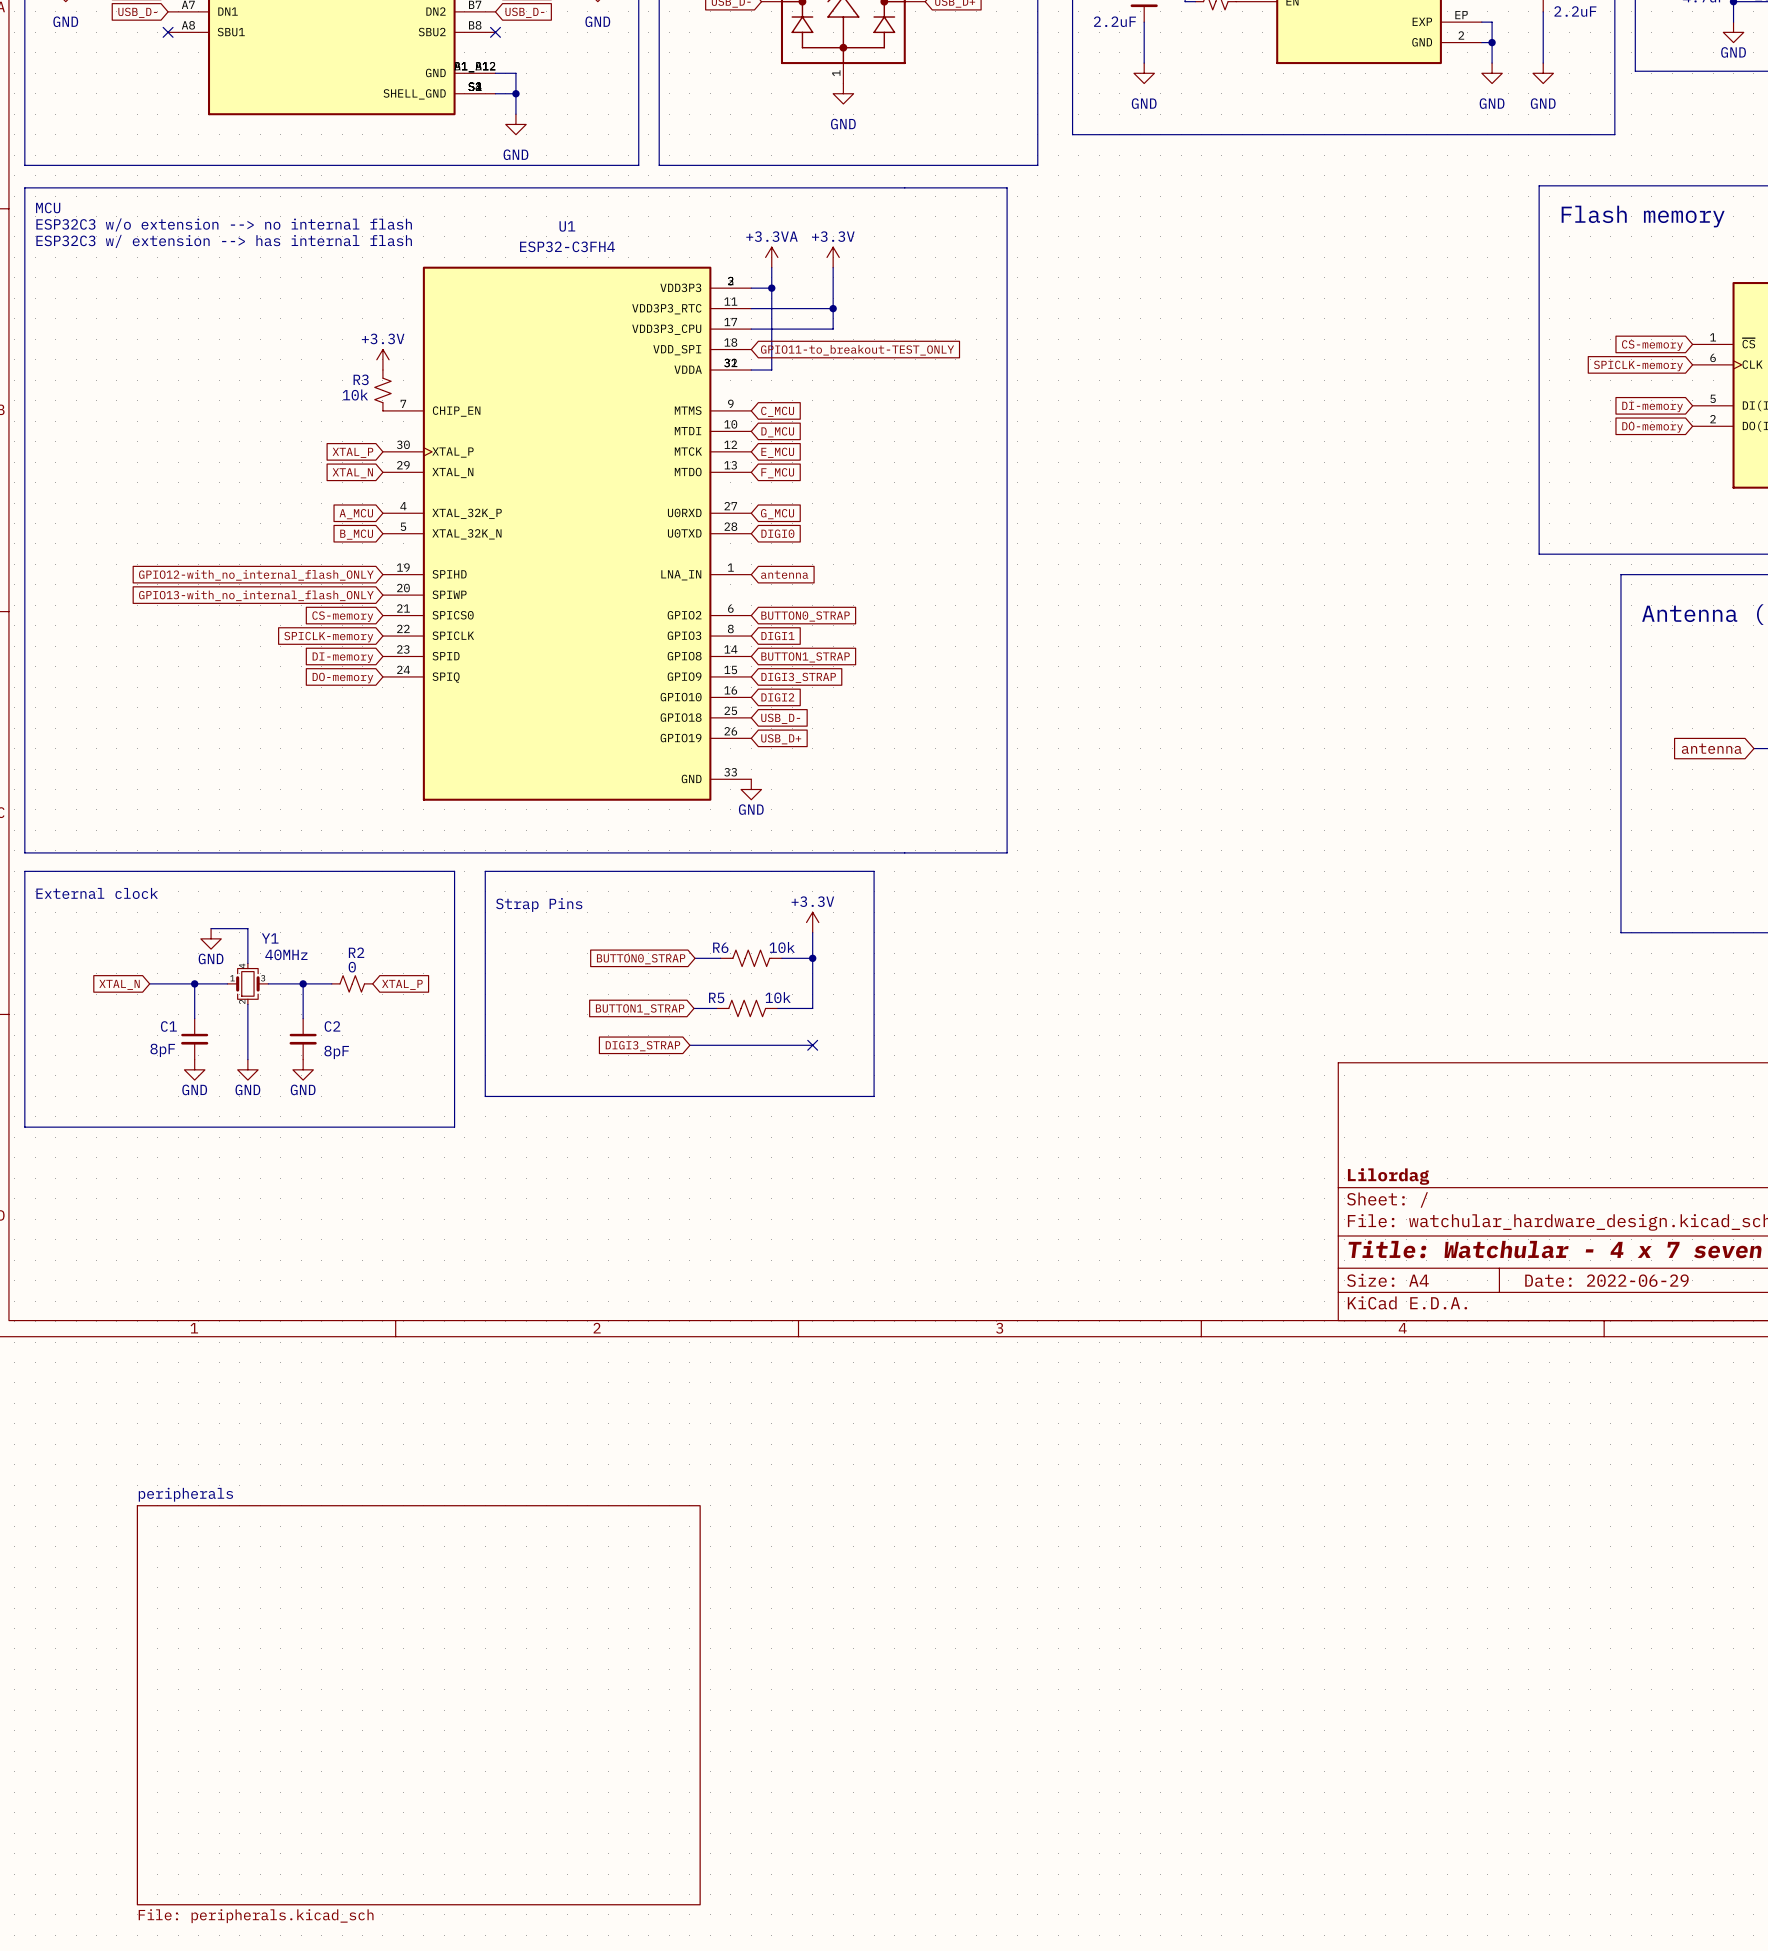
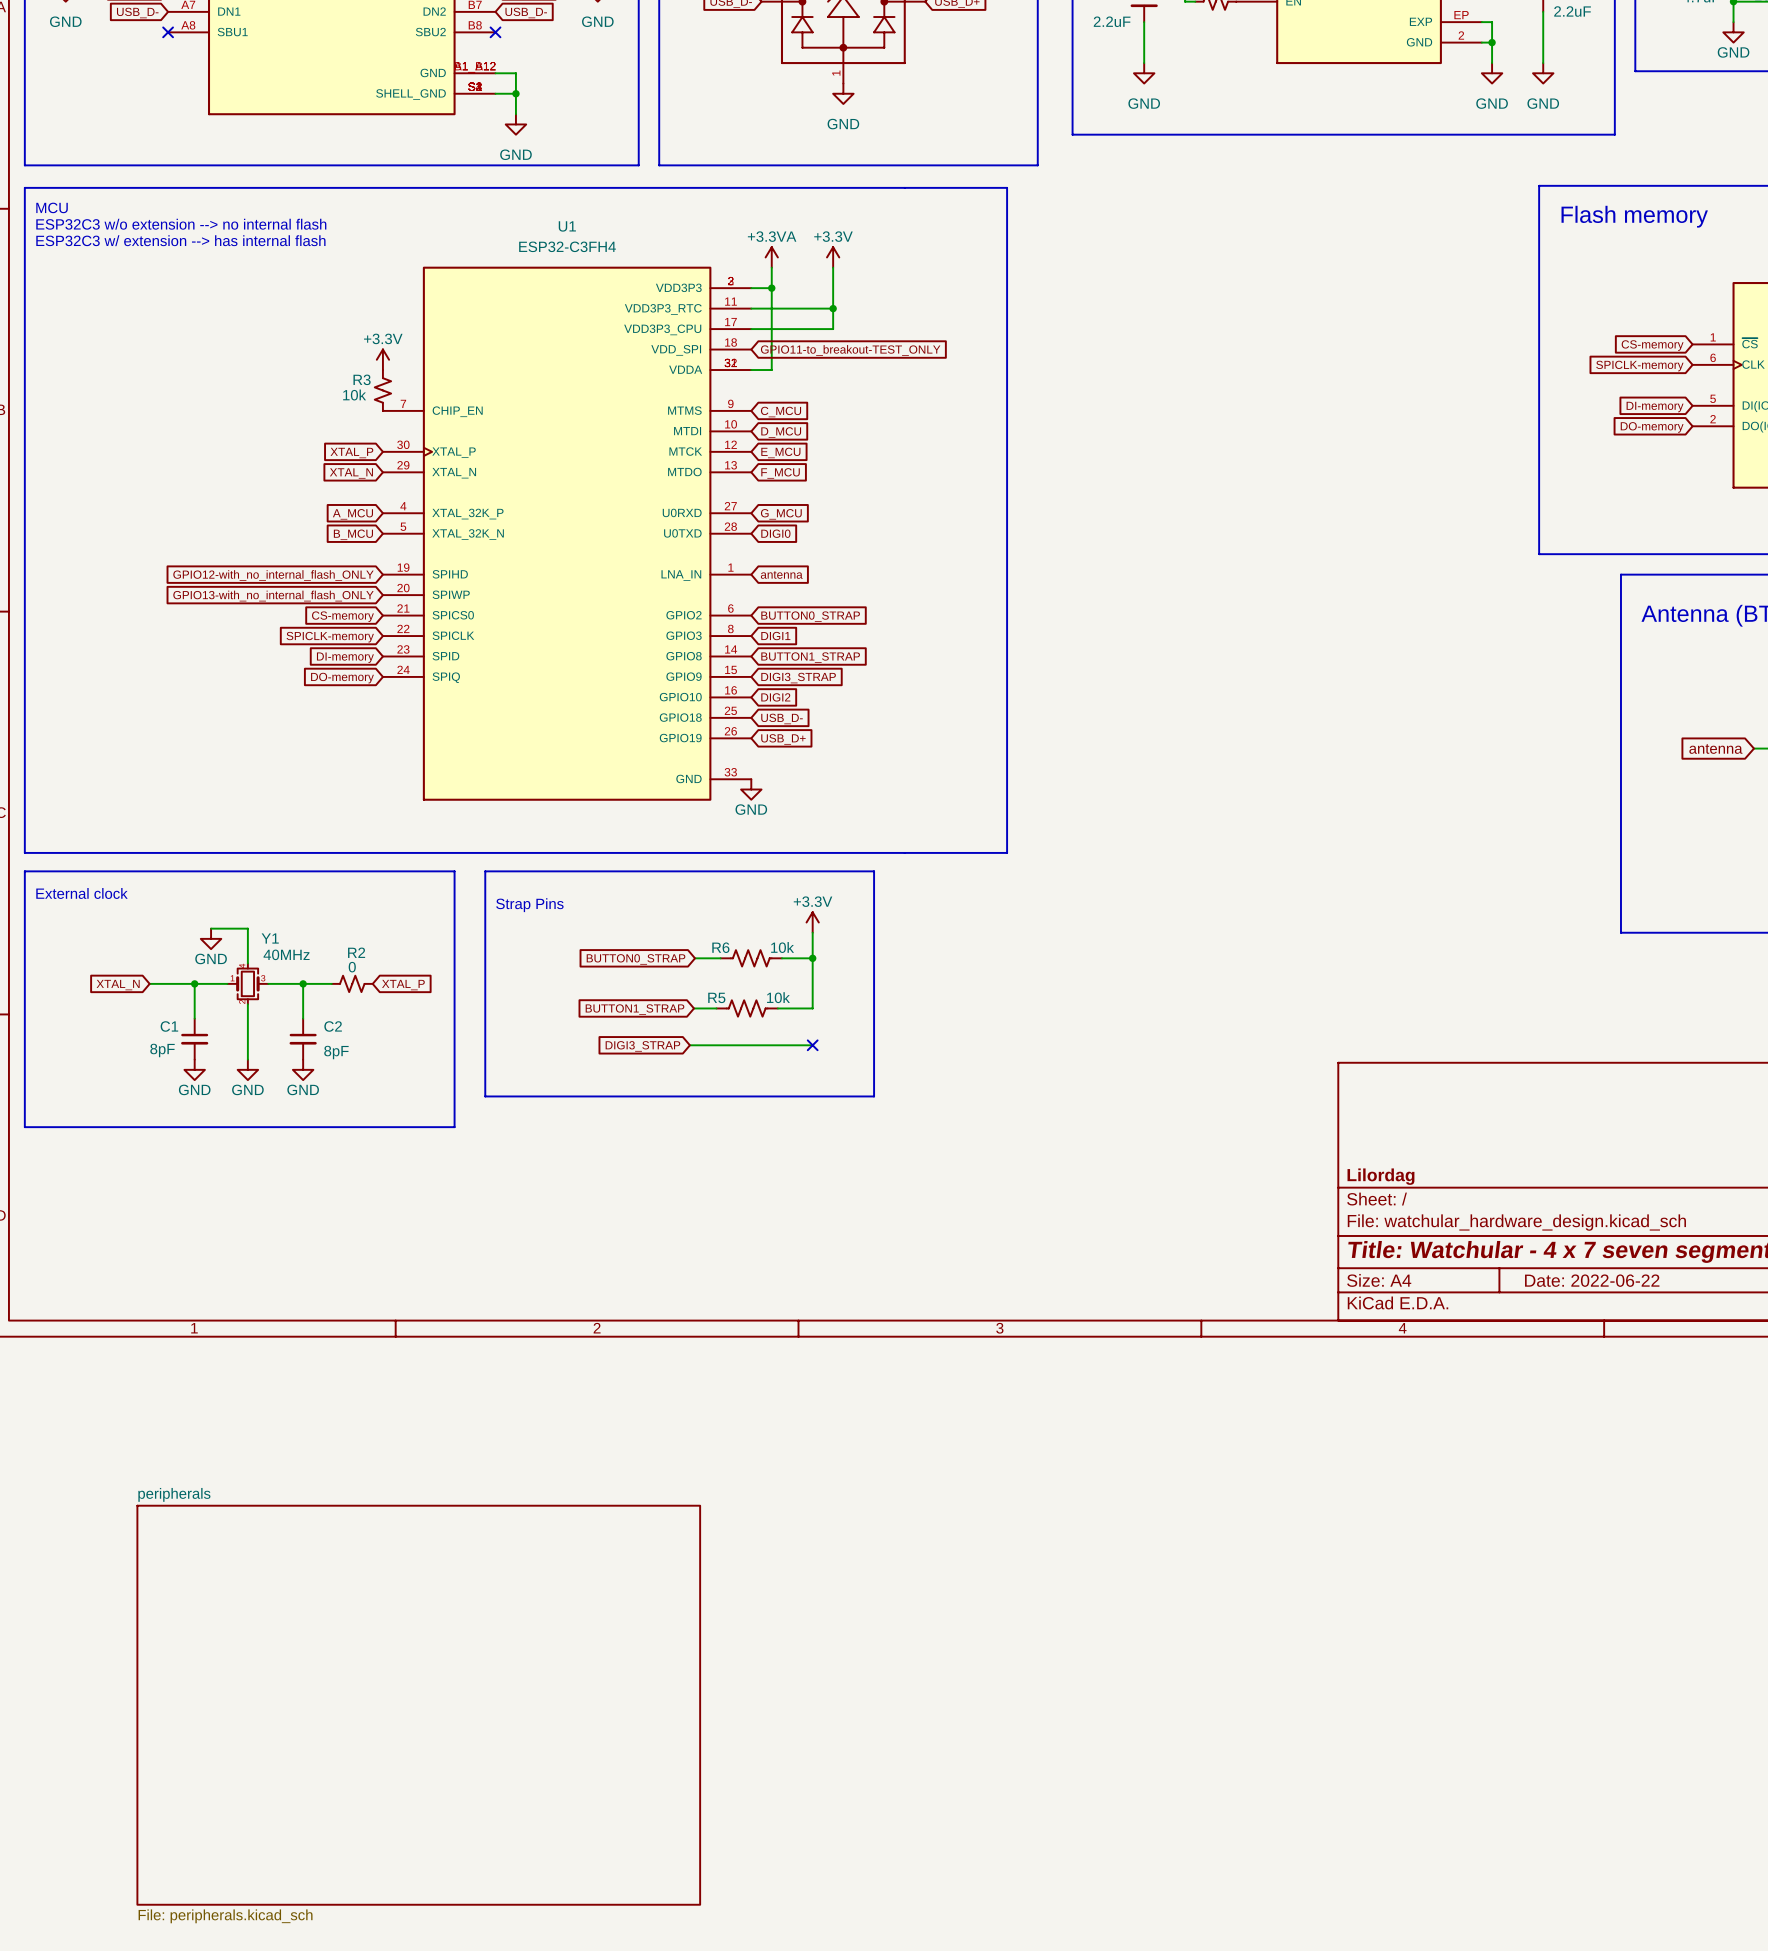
title block: Date: 2022-06-29 (1606, 1280) -> Date: 2022-06-22 (1592, 1280)

